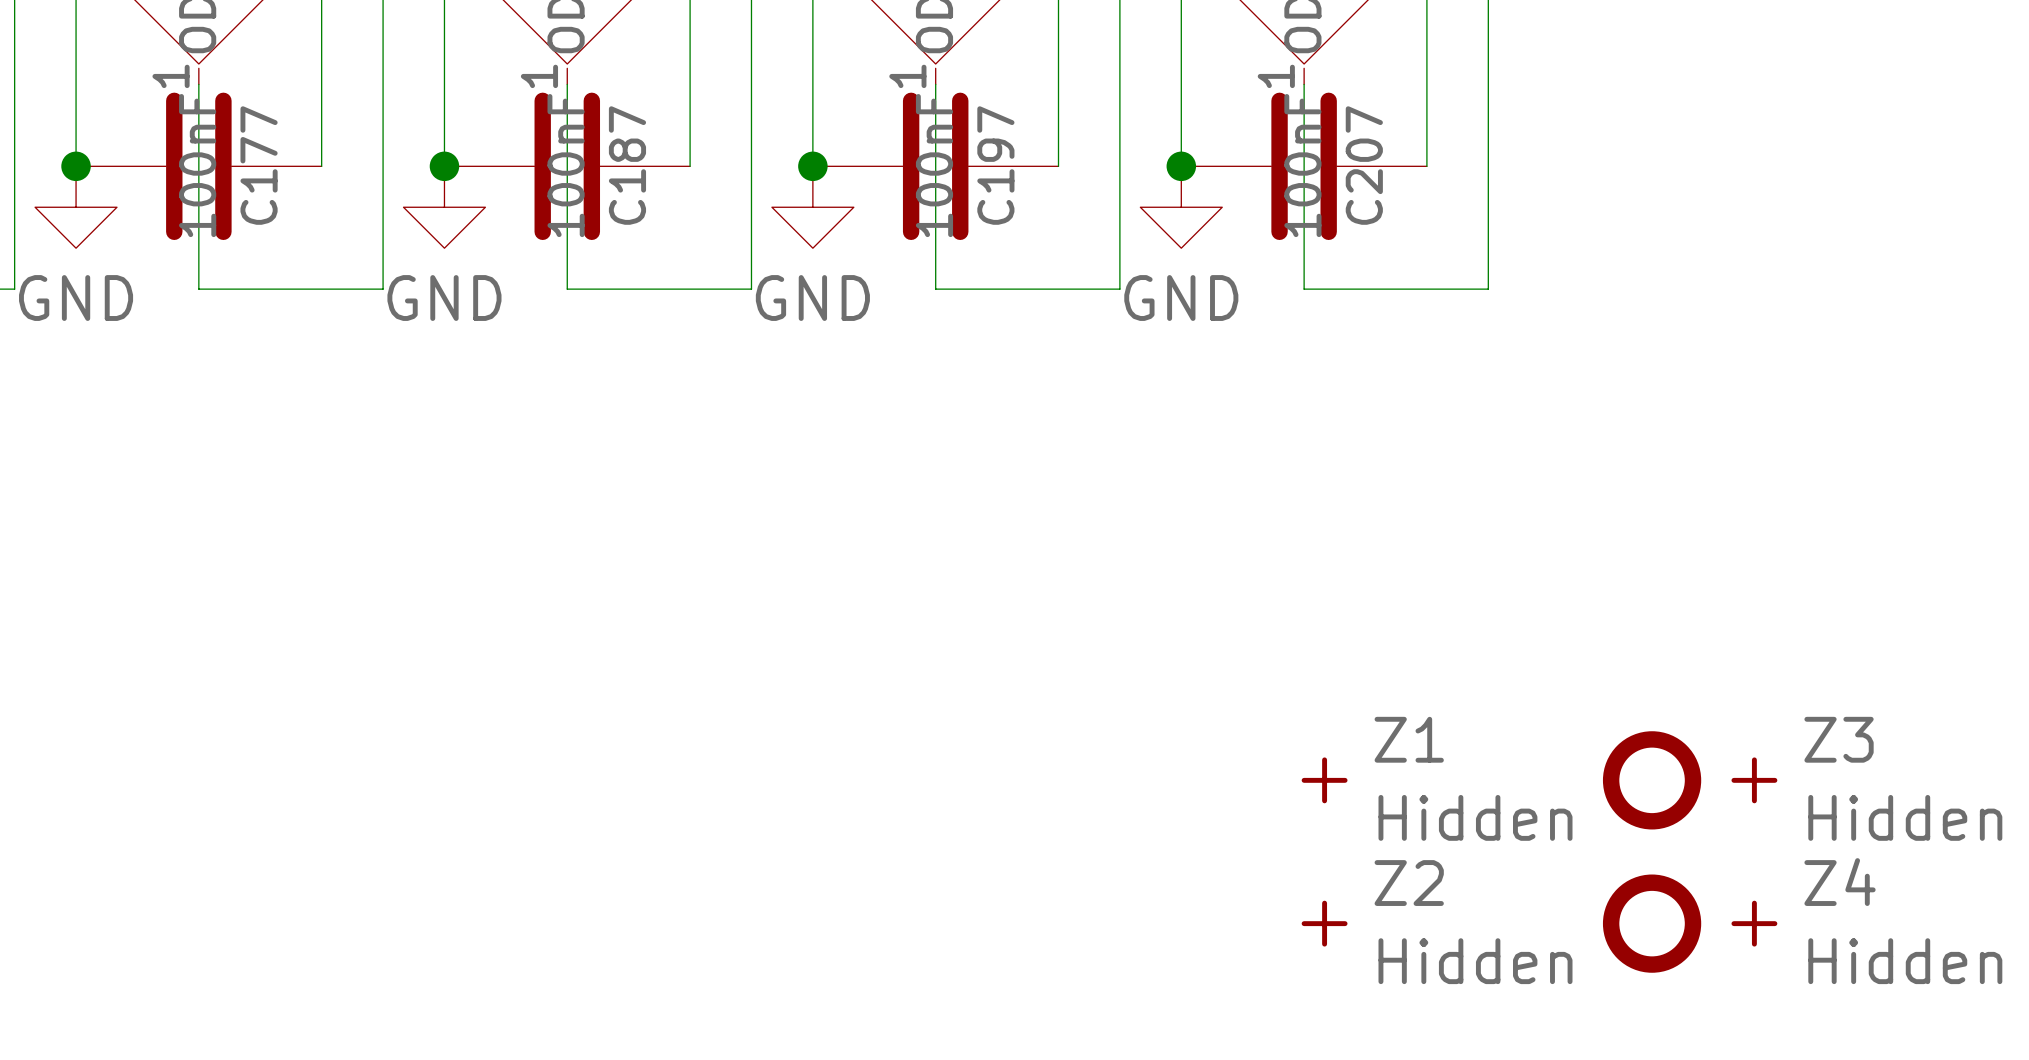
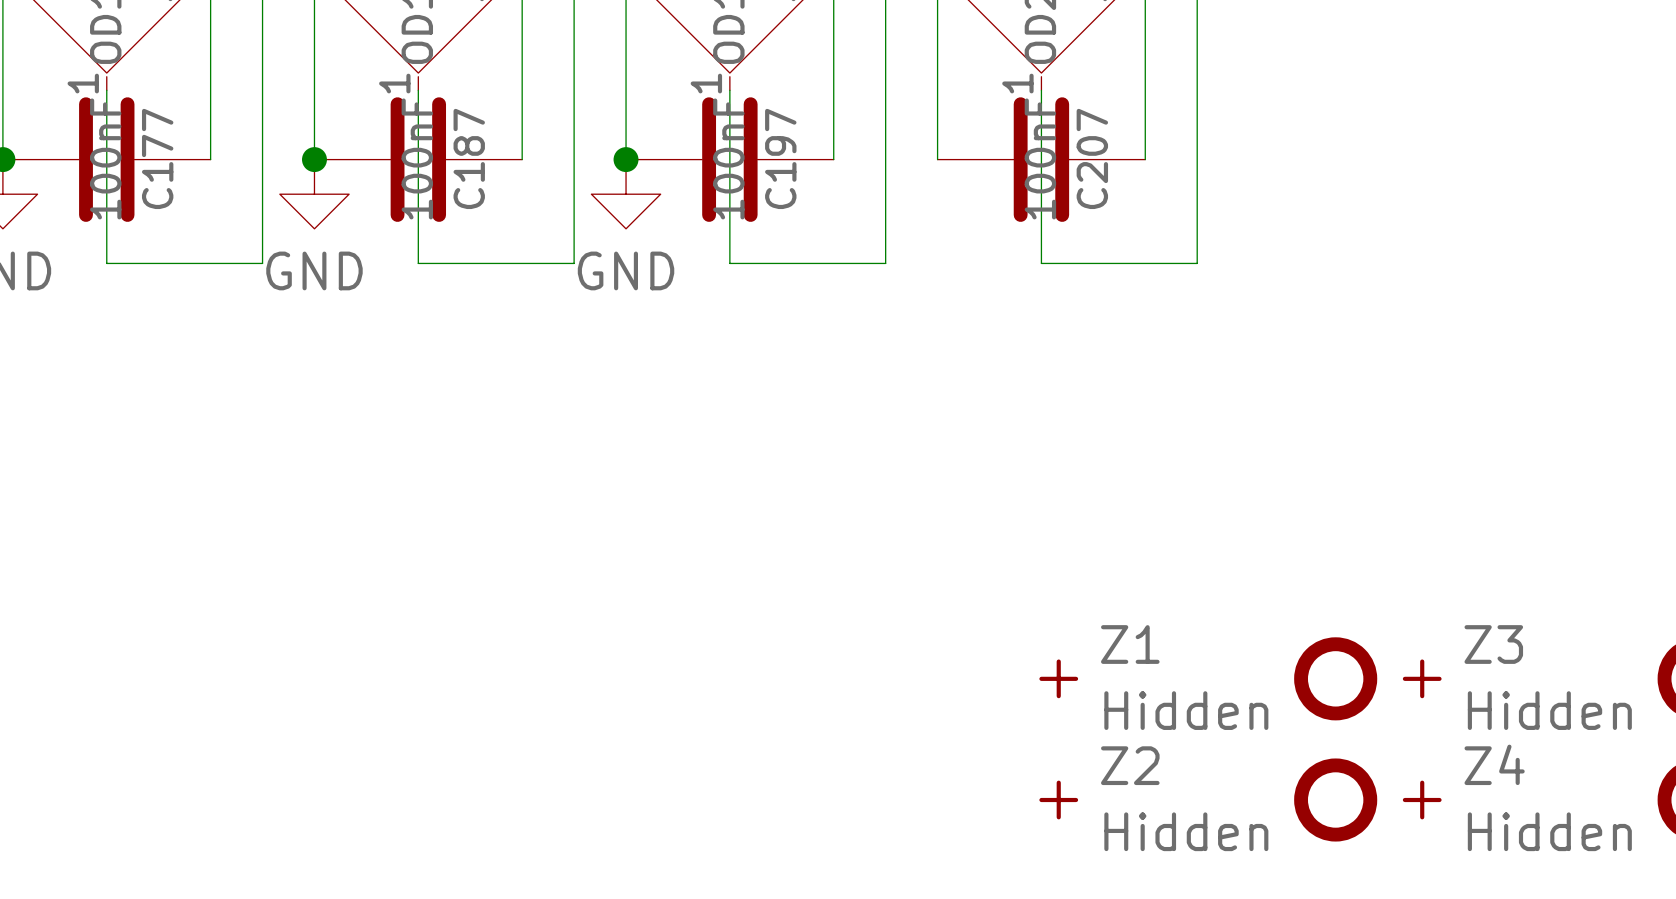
junction: (1181, 166) -> none
power symbol: GND (1181, 207) -> none

